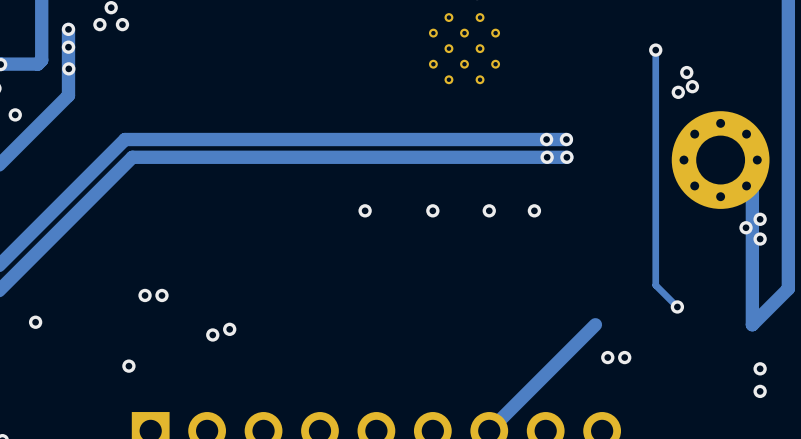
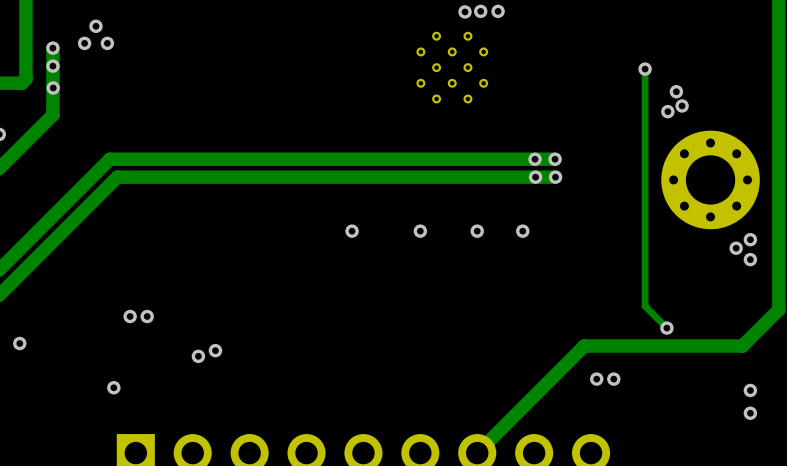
track: (752, 167) (752, 324) -> (584, 346) (742, 346)

